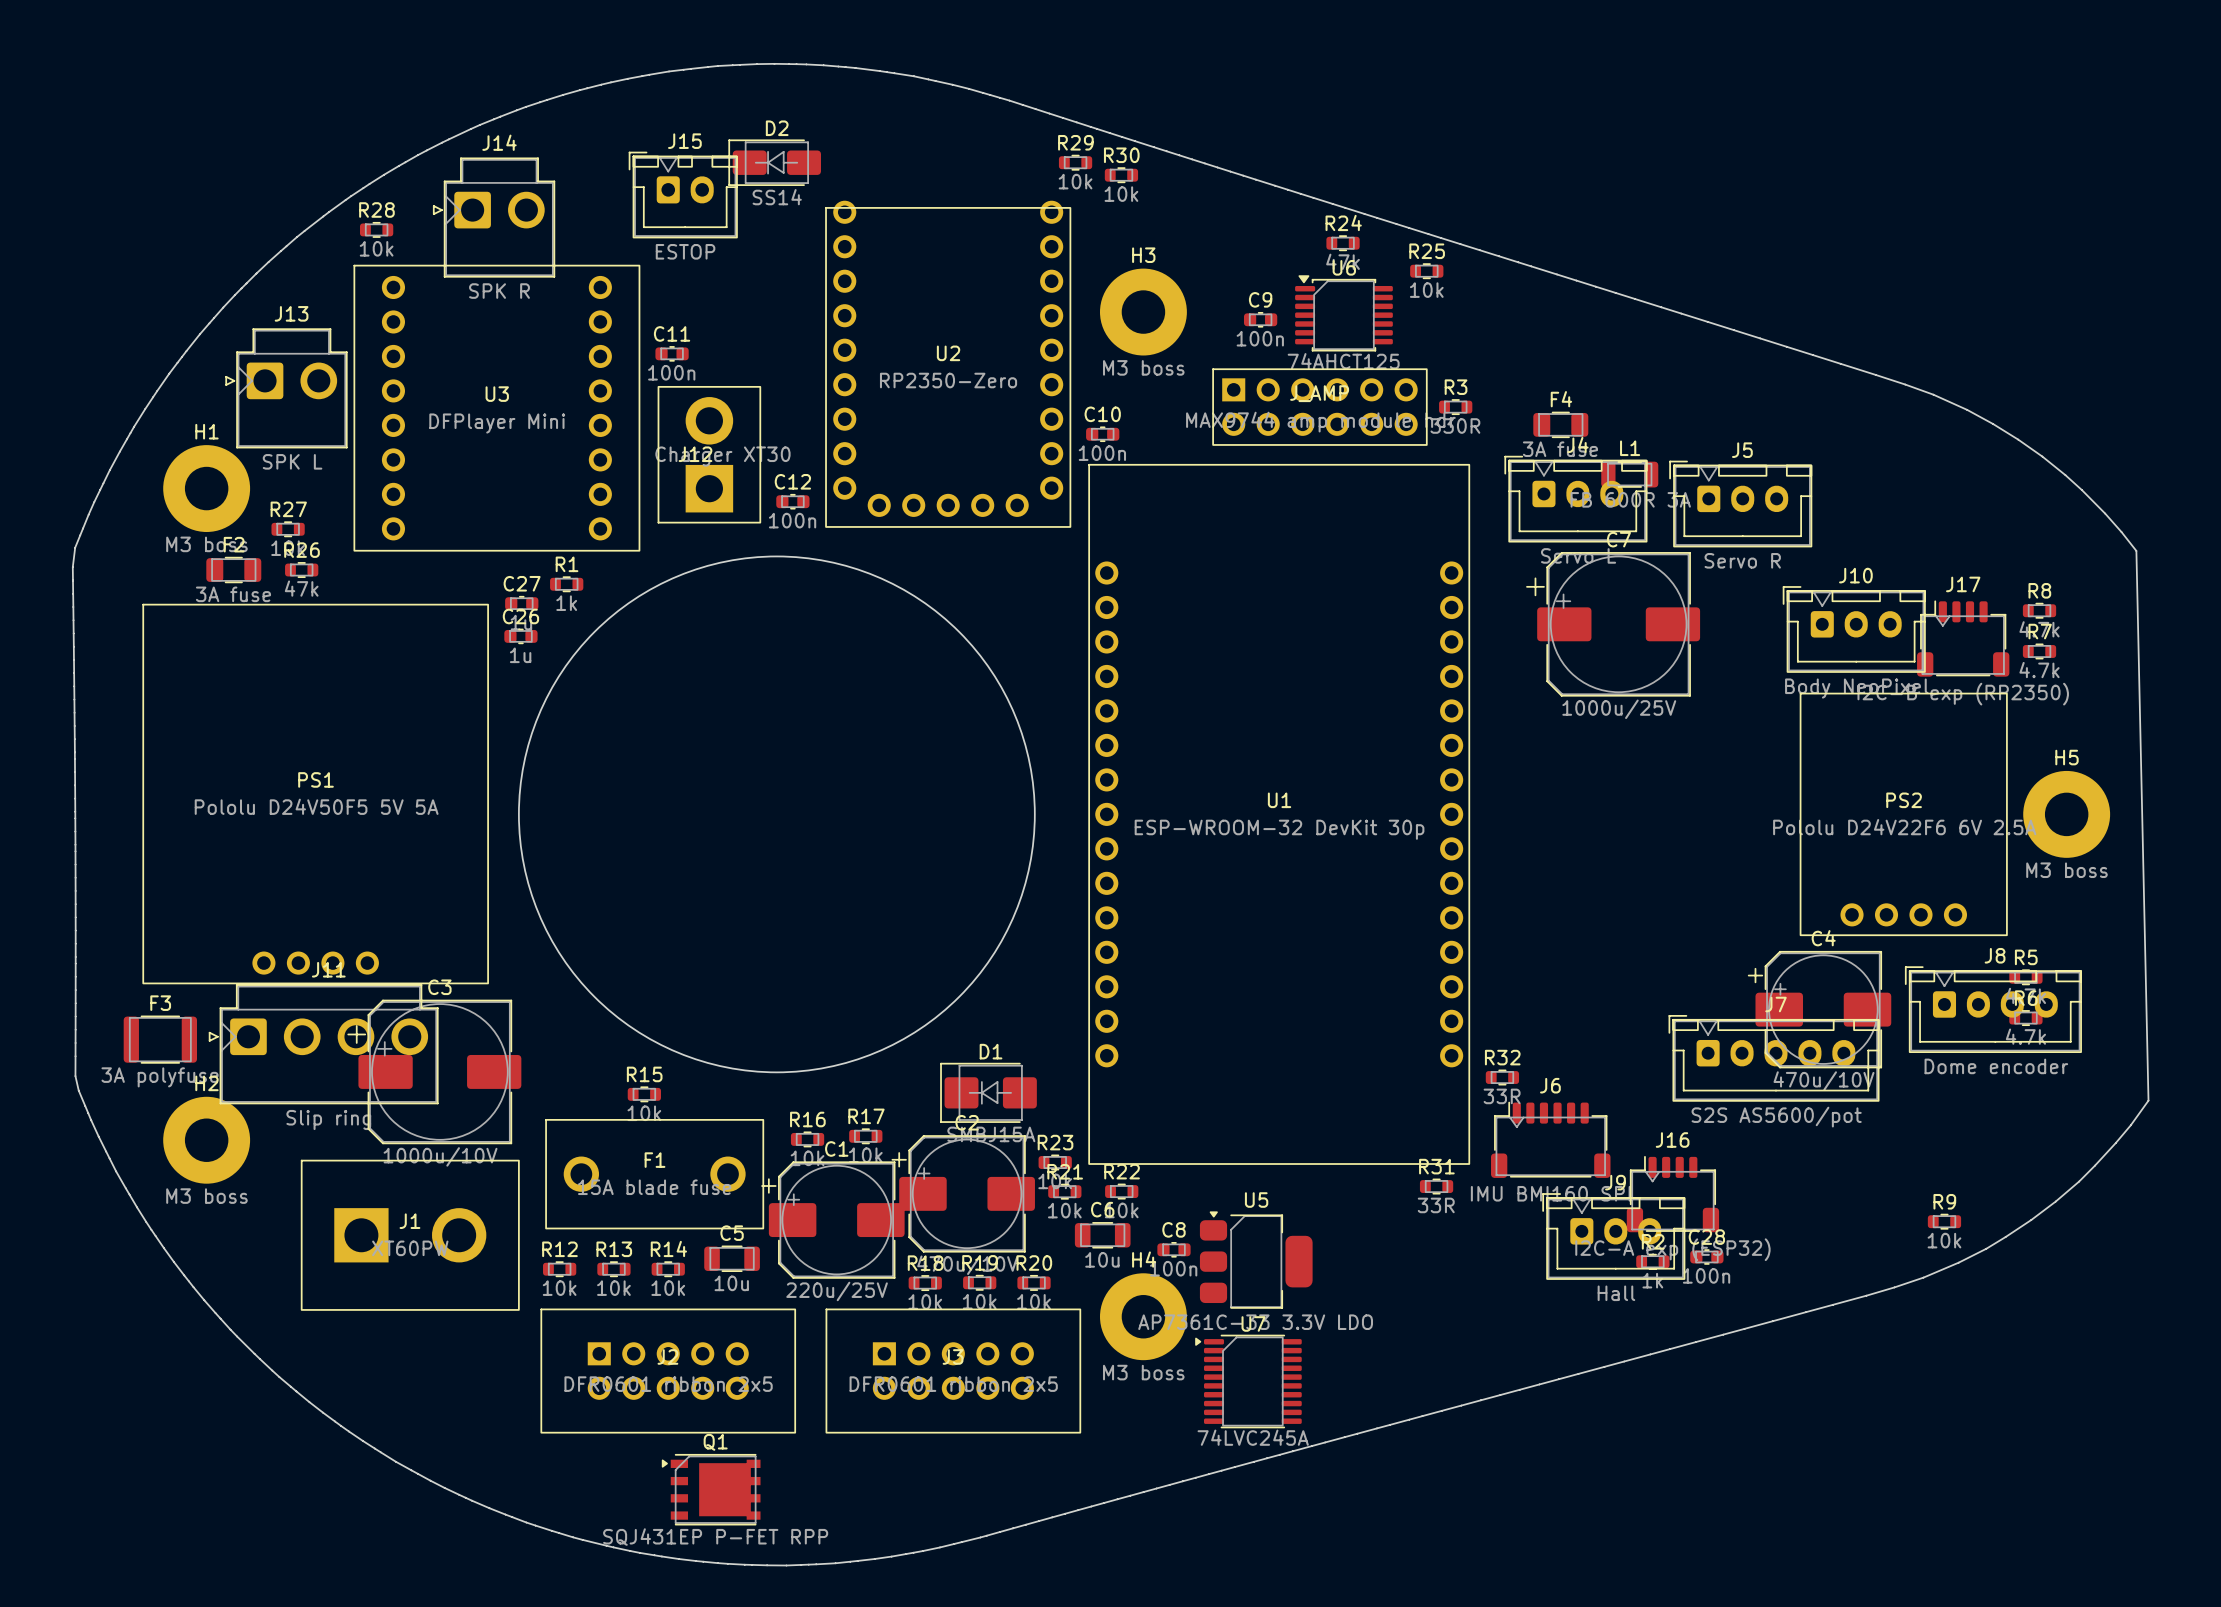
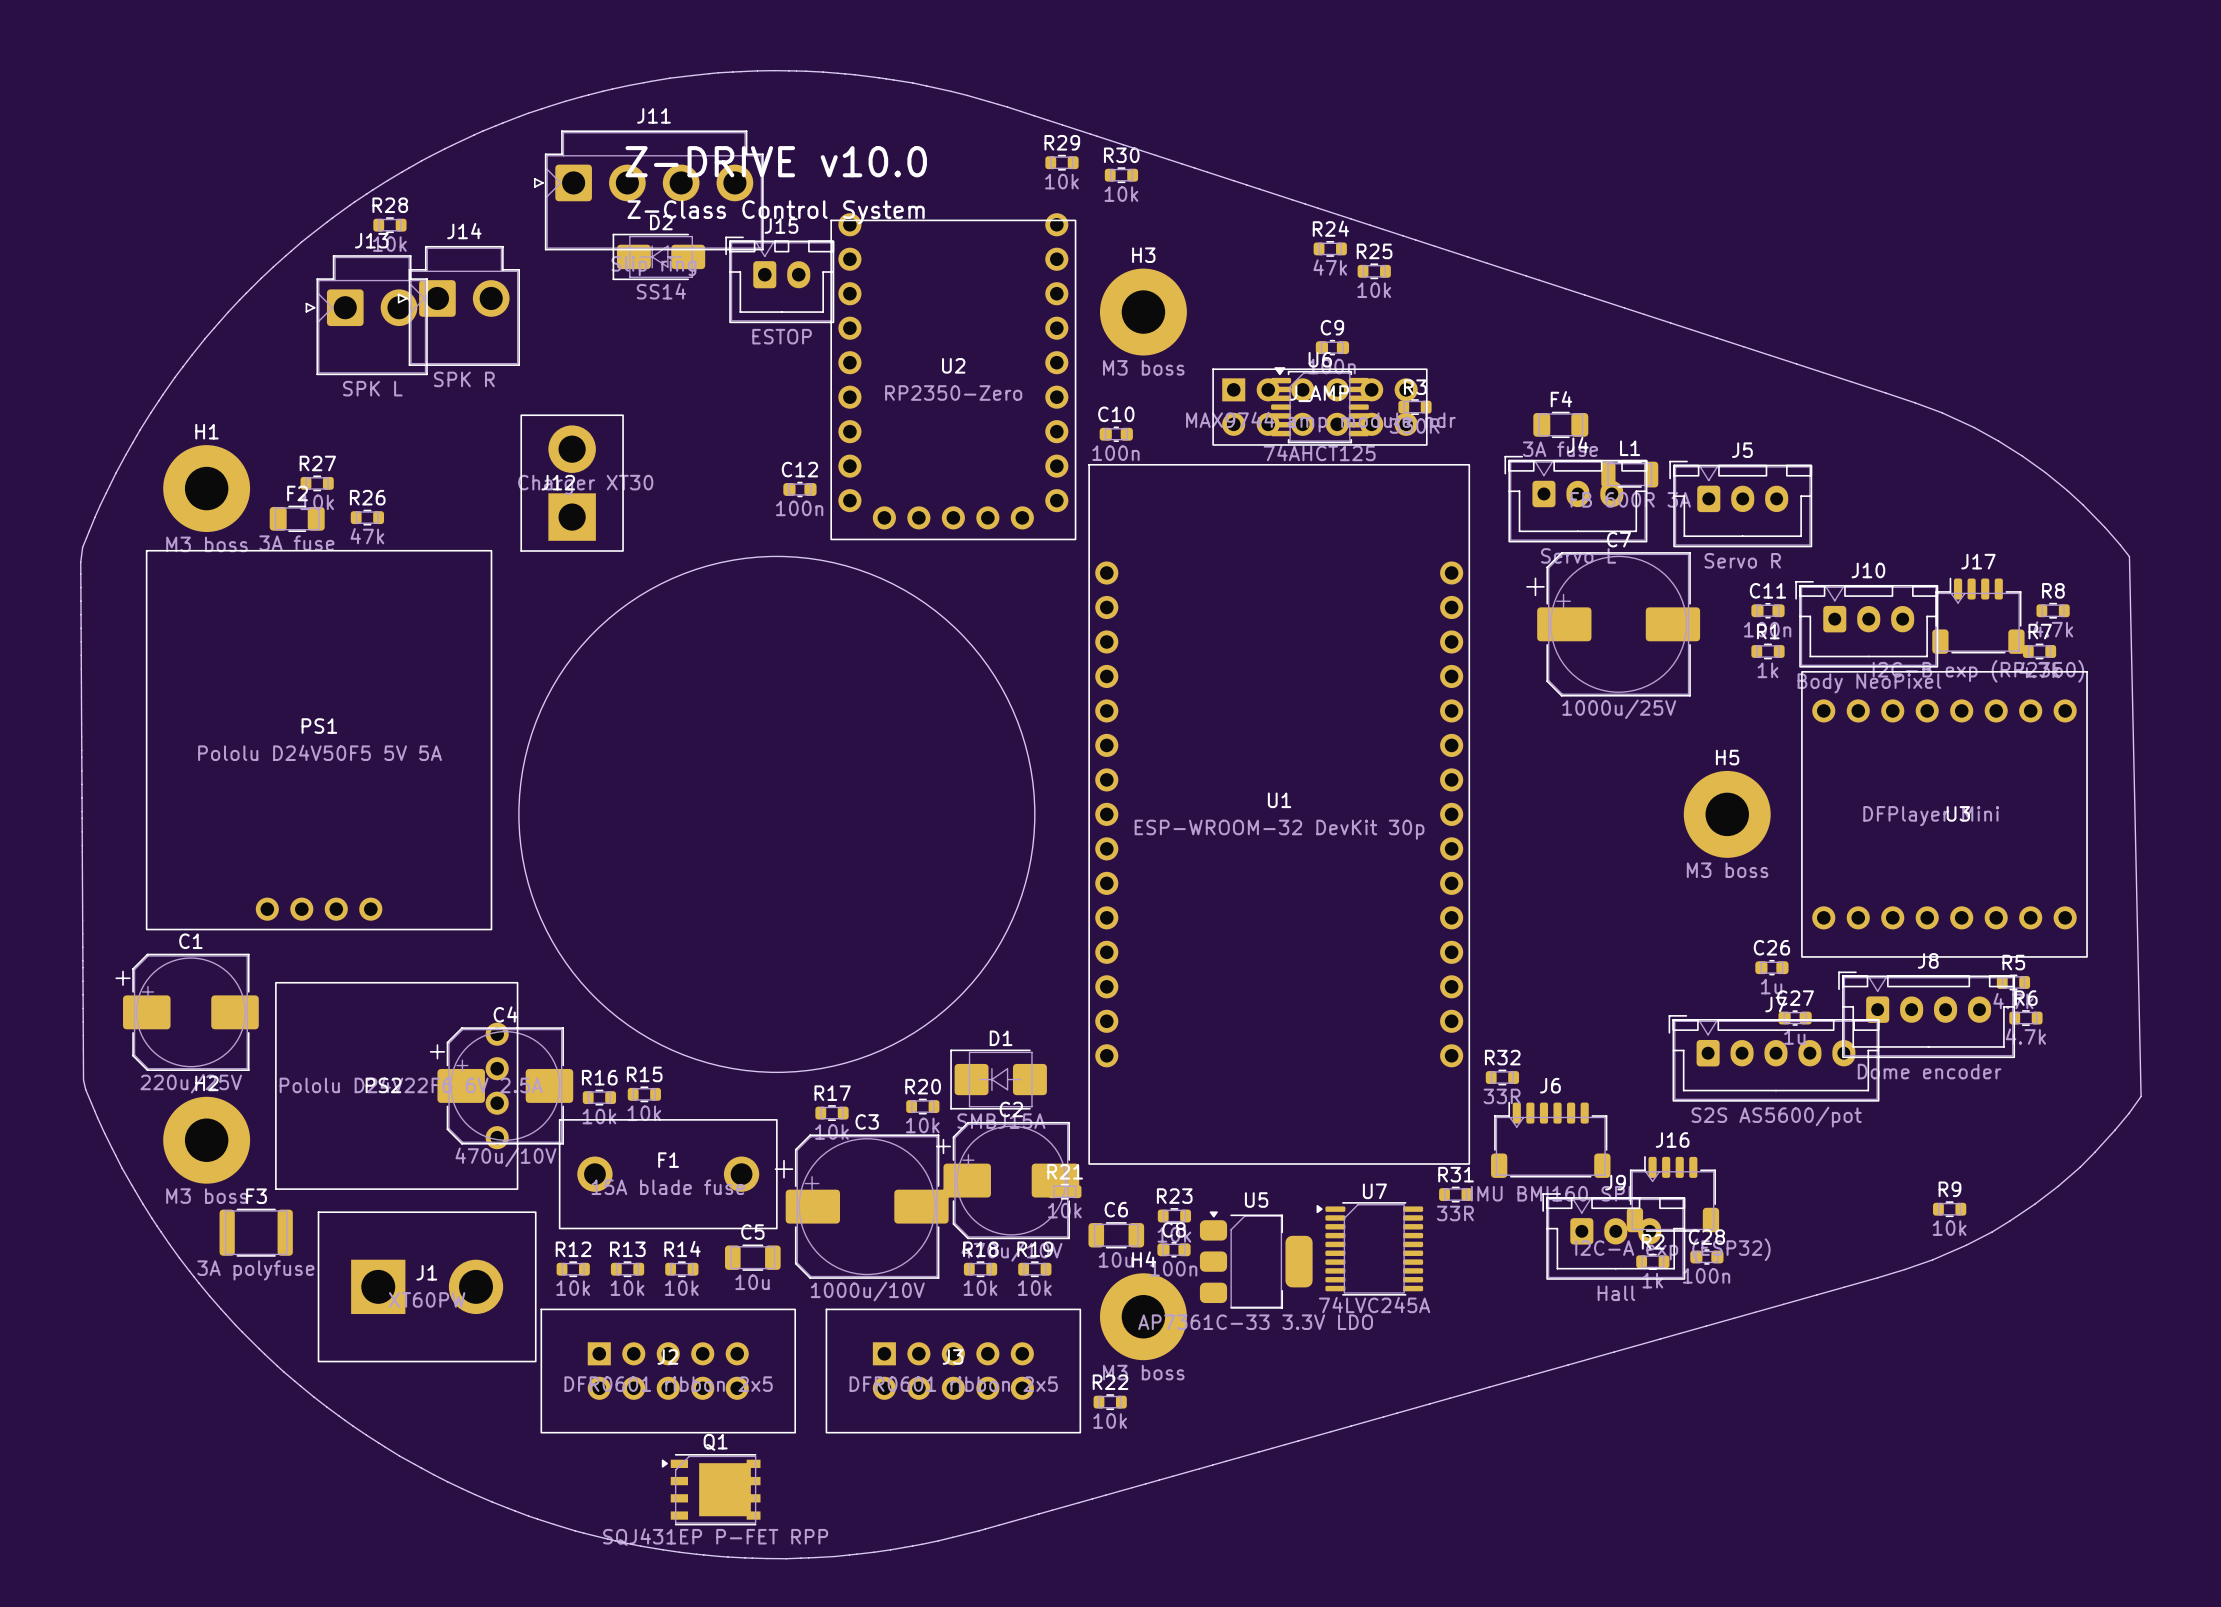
board edge: (774, 63) (845, 67) (914, 76) (1009, 100) (1905, 384) (1967, 409) (1993, 424) (2042, 456) (2082, 490) (2105, 513) (2136, 550) (2148, 1100) (2130, 1125) (2079, 1181) (2031, 1220) (1986, 1248) (1923, 1277) (1866, 1295) (980, 1537) (891, 1556) (816, 1564) (727, 1563) (639, 1552) (573, 1537) (489, 1508) (430, 1480) (362, 1440) (309, 1402) (279, 1377) (237, 1336) (204, 1300) (173, 1262) (146, 1221) (116, 1171) (78, 1090) (75, 1076) (72, 567) (75, 547) (94, 501) (119, 451) (145, 409) (186, 351) (223, 307) (268, 262) (304, 231) (351, 196) (398, 165) (448, 139) (500, 116) (563, 94) (610, 82) (669, 71) (717, 65) (774, 63) -> (774, 70) (718, 72) (669, 78) (612, 89) (565, 101) (503, 122) (451, 145) (402, 171) (354, 201) (301, 242) (261, 278) (228, 311) (191, 355) (150, 412) (125, 455) (100, 504) (82, 547) (80, 562) (83, 1080) (85, 1089) (122, 1168) (151, 1218) (179, 1257) (209, 1295) (241, 1331) (283, 1371) (327, 1407) (399, 1455) (447, 1481) (528, 1516) (584, 1533) (641, 1546) (728, 1557) (815, 1557) (890, 1549) (979, 1530) (1877, 1277) (1932, 1259) (1992, 1231) (2034, 1204) (2080, 1167) (2129, 1113) (2141, 1096) (2129, 556) (2082, 504) (2045, 472) (2022, 456) (1974, 427) (1915, 402) (1007, 107) (912, 82) (845, 73) (774, 70)
text: none -> Z-DRIVE v10.0 (776, 161)
D2 position: (774, 162) -> (658, 256)
R29 position: (1075, 162) -> (1061, 162)
J15 position: (683, 195) -> (779, 279)
text: none -> Z-Class Control System (776, 212)
J14 position: (494, 217) -> (458, 305)
R28 position: (376, 229) -> (389, 225)
R24 position: (1343, 243) -> (1330, 248)
R25 position: (1426, 271) -> (1374, 271)
U6 position: (1343, 313) -> (1319, 405)
C9 position: (1260, 319) -> (1332, 347)
C11 position: (672, 353) -> (1767, 610)
U2 position: (948, 364) -> (953, 376)
J13 position: (286, 388) -> (366, 315)
R3 position: (1455, 407) -> (1414, 407)
U3 rotation: 0° (496, 408) -> 90° clockwise (1944, 814)
U3 position: (496, 408) -> (1944, 814)
C10 position: (1102, 434) -> (1116, 434)
J12 position: (709, 454) -> (572, 483)
C12 position: (792, 501) -> (799, 489)
R27 position: (288, 529) -> (317, 483)
F2 position: (233, 570) -> (297, 518)
R26 position: (301, 570) -> (367, 517)
R1 position: (566, 584) -> (1767, 651)
C27 position: (521, 603) -> (1795, 1018)
R8 position: (2039, 610) -> (2053, 610)
J10 position: (1854, 629) -> (1866, 624)
C26 position: (520, 636) -> (1771, 967)
J17 position: (1963, 638) -> (1978, 615)
PS1 position: (315, 794) -> (319, 740)
PS2 rotation: 0° (1903, 814) -> 90° counterclockwise (396, 1085)
PS2 position: (1903, 814) -> (396, 1085)
H5 position: (2066, 814) -> (1727, 814)
R5 position: (2025, 977) -> (2013, 982)
C4 position: (1819, 1009) -> (501, 1085)
J8 position: (1993, 1009) -> (1926, 1014)
F3 position: (160, 1039) -> (256, 1232)
J11 position: (323, 1044) -> (648, 190)
C3 position: (434, 1071) -> (861, 1206)
D1 position: (988, 1092) -> (998, 1079)
R17 position: (865, 1136) -> (831, 1113)
R16 position: (807, 1139) -> (599, 1097)
R23 position: (1055, 1162) -> (1174, 1215)
F1 position: (654, 1174) -> (668, 1174)
R31 position: (1436, 1186) -> (1455, 1194)
R22 position: (1121, 1191) -> (1110, 1402)
C2 position: (963, 1193) -> (1007, 1180)
C1 position: (832, 1220) -> (187, 1012)
R9 position: (1944, 1221) -> (1949, 1209)
J1 position: (410, 1235) -> (427, 1286)
C6 position: (1102, 1235) -> (1116, 1235)
C5 position: (732, 1258) -> (752, 1257)
R12 position: (559, 1269) -> (573, 1269)
R13 position: (613, 1269) -> (627, 1269)
R14 position: (668, 1269) -> (681, 1269)
R19 position: (979, 1282) -> (1034, 1269)
R20 position: (1034, 1282) -> (922, 1106)
R18 position: (925, 1283) -> (980, 1269)
U7 position: (1248, 1381) -> (1369, 1248)

